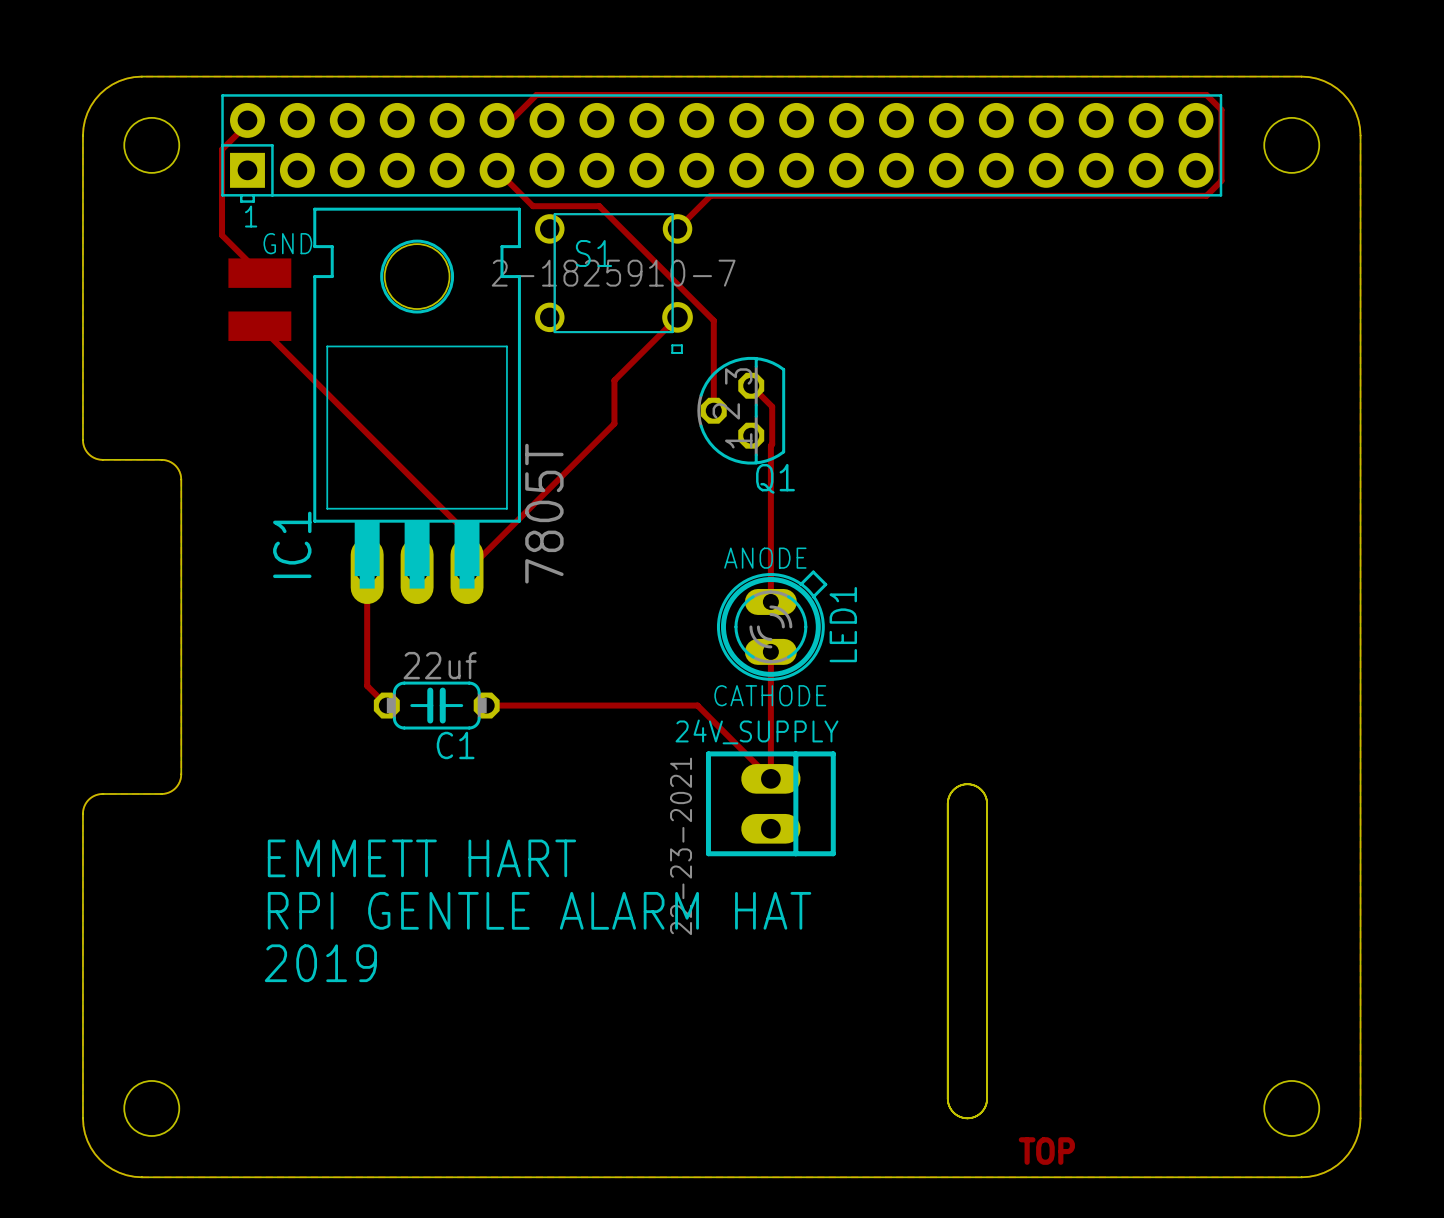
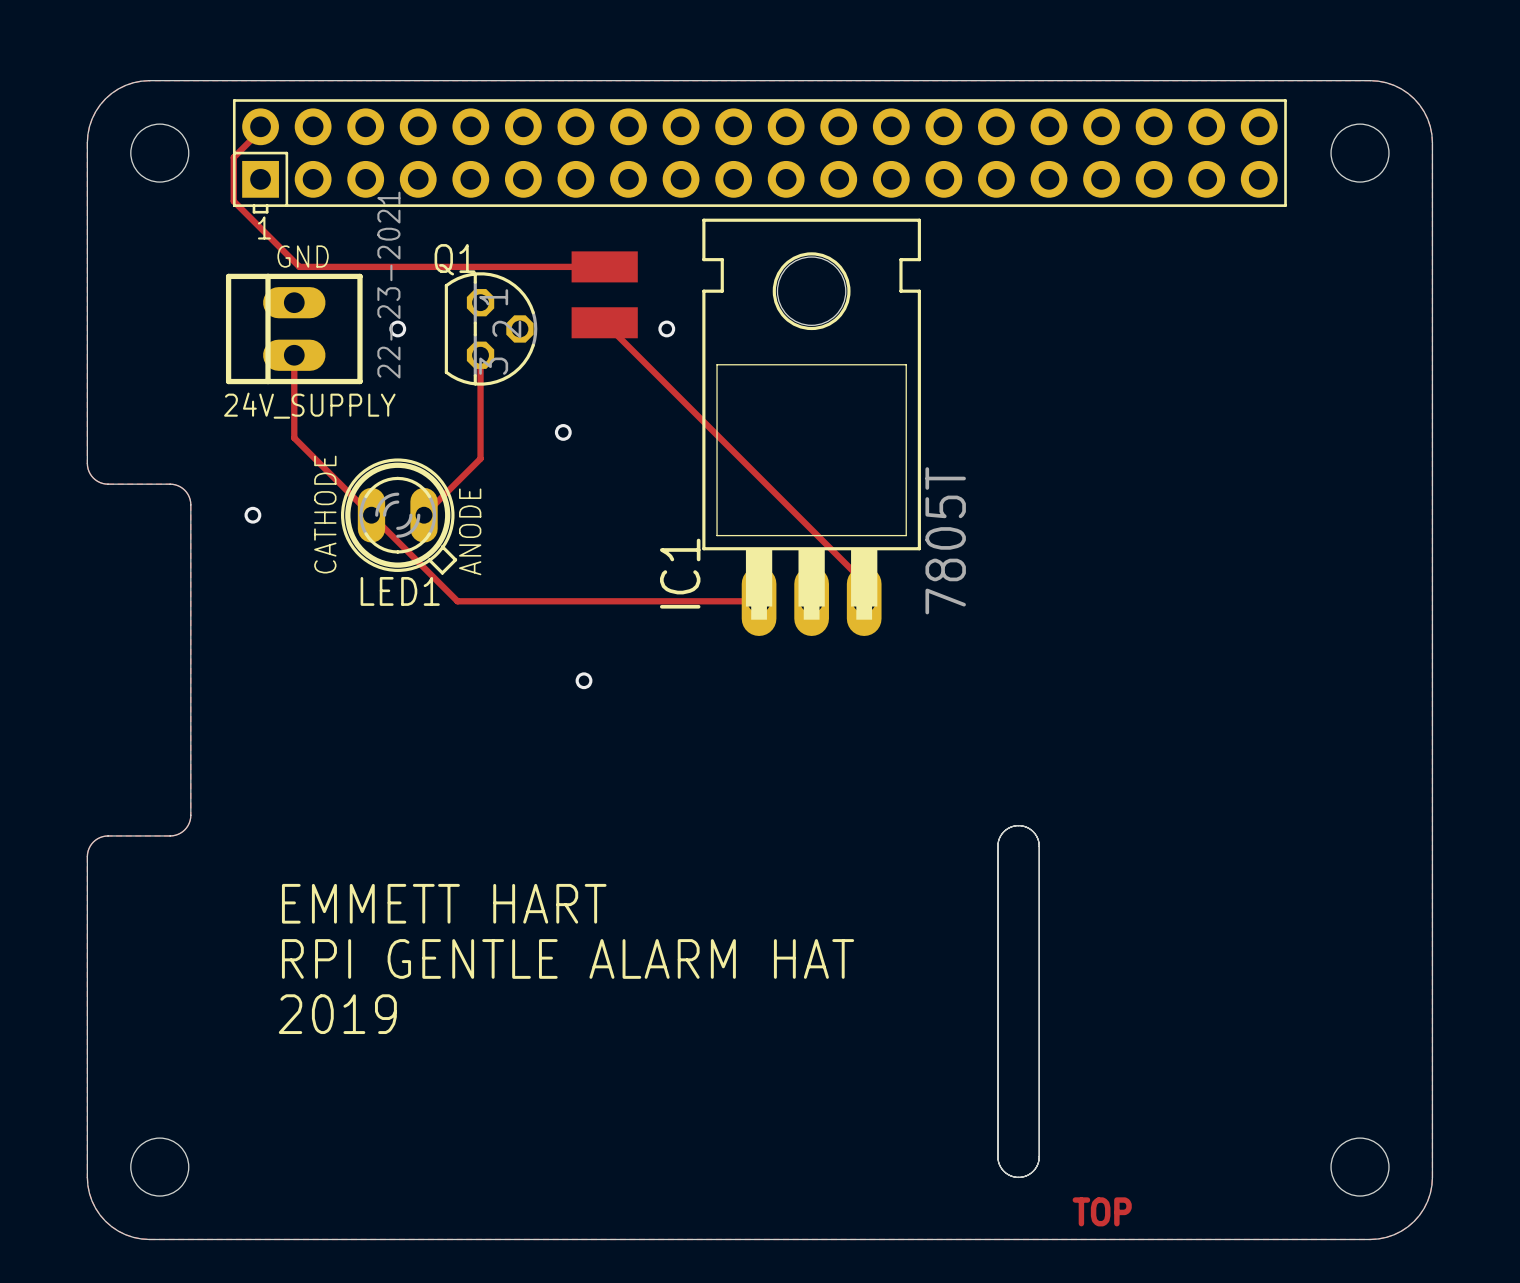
track: (497, 120) (511, 120) (536, 94) (1206, 94) (1221, 109) (1221, 180) (1206, 195) (710, 195) (677, 228) -> none
track: (497, 170) (532, 206) (599, 206) (713, 320) (713, 410) -> none
track: (222, 191) (222, 235) (259, 273) -> (233, 201) (299, 266) (604, 266)
S1: 2-1825910-7 (613, 283) -> none
part position: (259, 299) -> (604, 294)
track: none -> (604, 322) (864, 582) (864, 601)
via: none -> (397, 328)
via: none -> (666, 328)
track: (677, 317) (614, 380) (614, 423) (467, 571) (467, 533) (259, 326) -> none
track: none -> (294, 355) (294, 438) (457, 601) (759, 601)
track: none -> (480, 355) (480, 458) (424, 515)
Q1 footprint: [697, 356, 786, 465] -> [444, 272, 538, 386]
track: (751, 385) (772, 406) (770, 601) -> none
IC1 position: (417, 405) -> (811, 427)
via: none -> (563, 432)
Q1 name position: Q1 (775, 478) -> Q1 (455, 259)
text: none -> CATHODE (325, 514)
via: none -> (252, 515)
text rotation: 0° (765, 558) -> 90° counterclockwise (470, 531)
text position: ANODE (765, 558) -> ANODE (470, 531)
track: (367, 571) (367, 685) (386, 705) -> none
LED1 rotation: 0° (772, 625) -> 90° clockwise (399, 516)
LED1 position: (772, 625) -> (399, 516)
via: none -> (584, 680)
track: (770, 651) (770, 778) (697, 705) (486, 705) -> none
text: CATHODE (770, 695) -> none
C1: 22uf (436, 705) -> none
24V_SUPPLY rotation: 0° (770, 803) -> 180° (294, 328)
24V_SUPPLY position: (770, 803) -> (294, 328)

